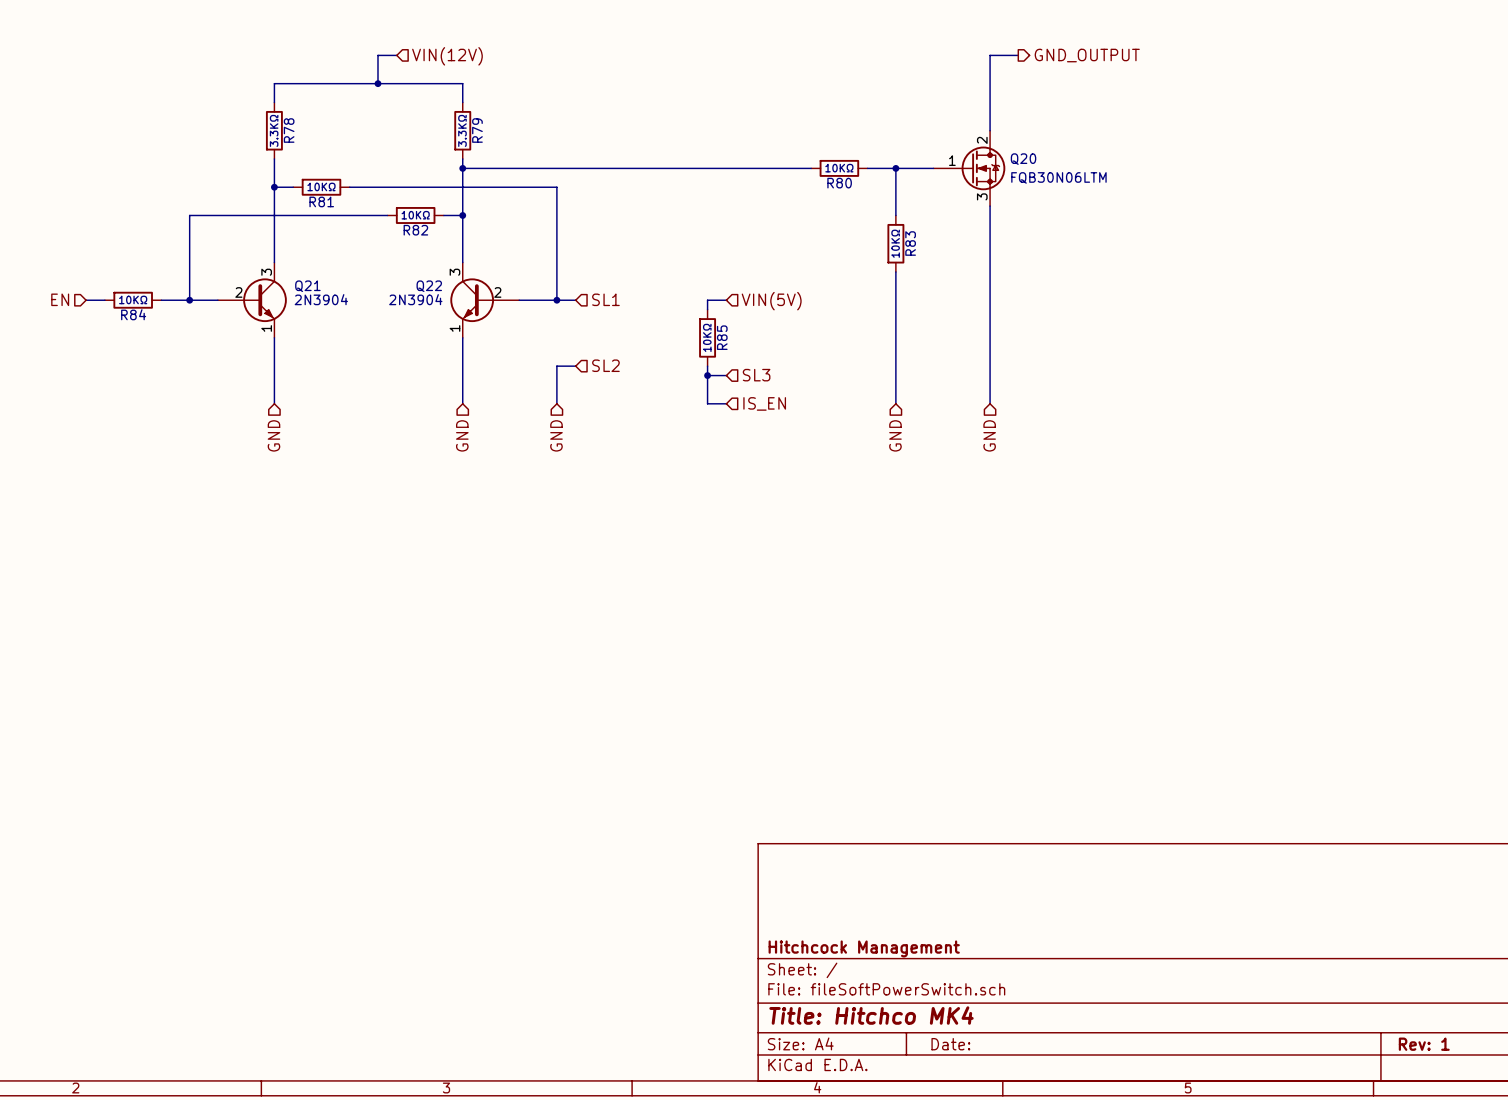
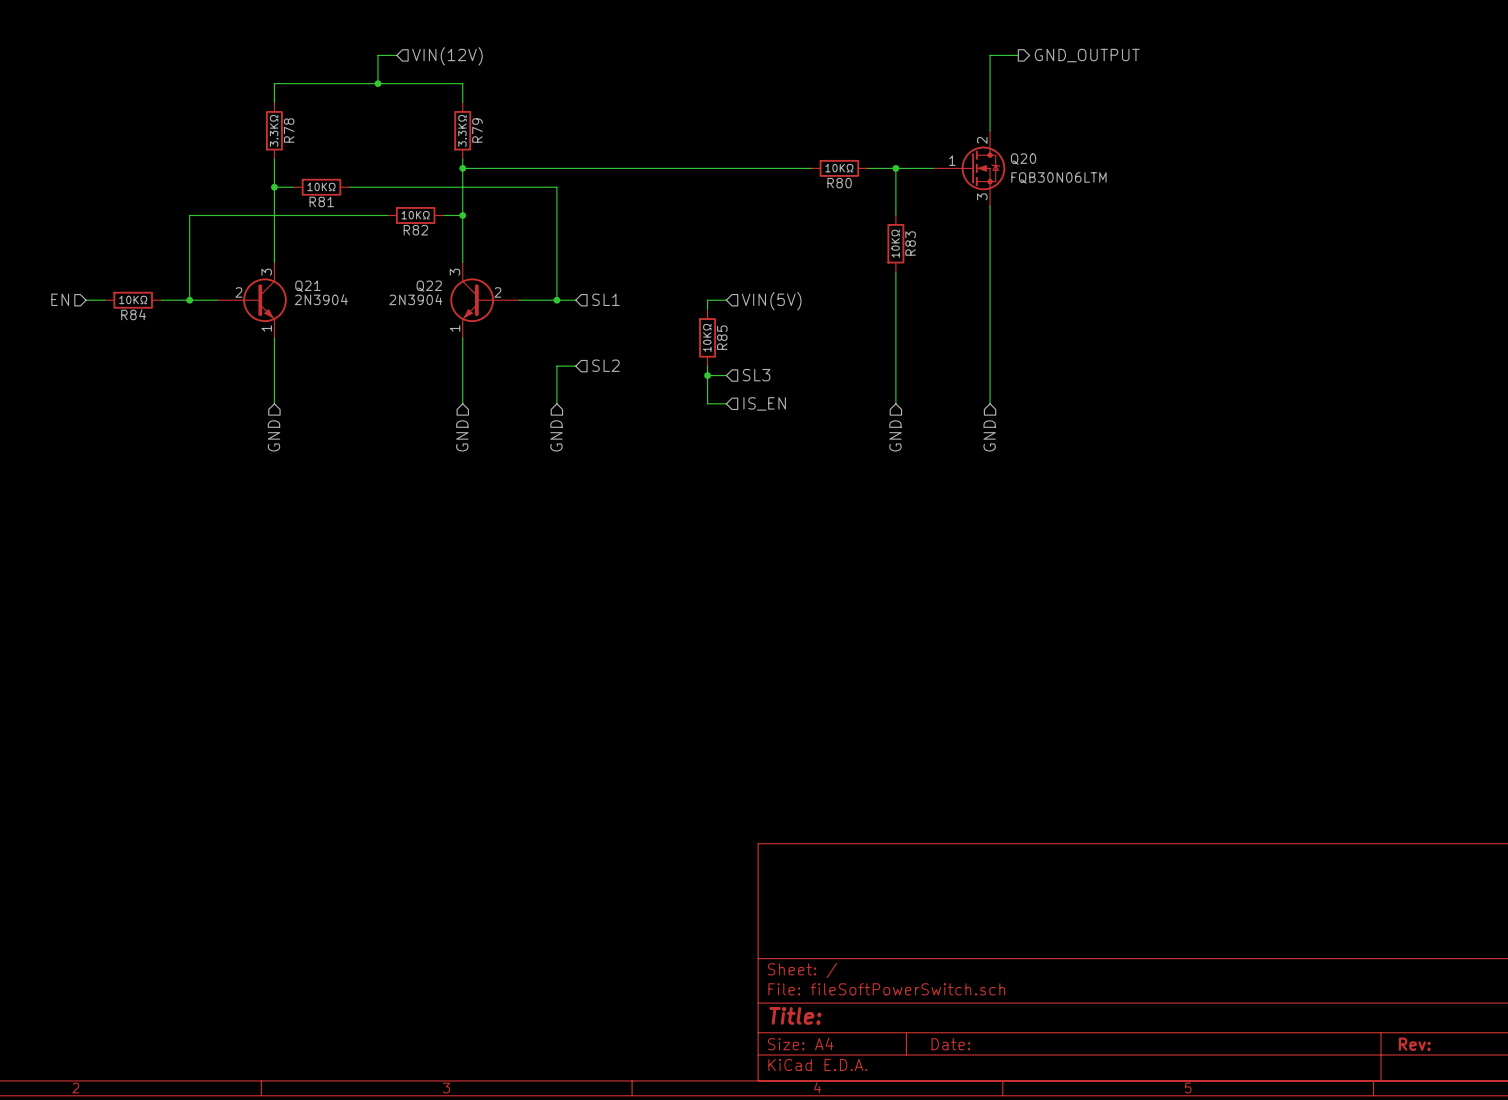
title block: Hitchcock Management (864, 948) -> none
title block: Title: Hitchco MK4 (871, 1015) -> Title: (795, 1015)
title block: Rev: 1 (1424, 1044) -> Rev: (1414, 1044)

